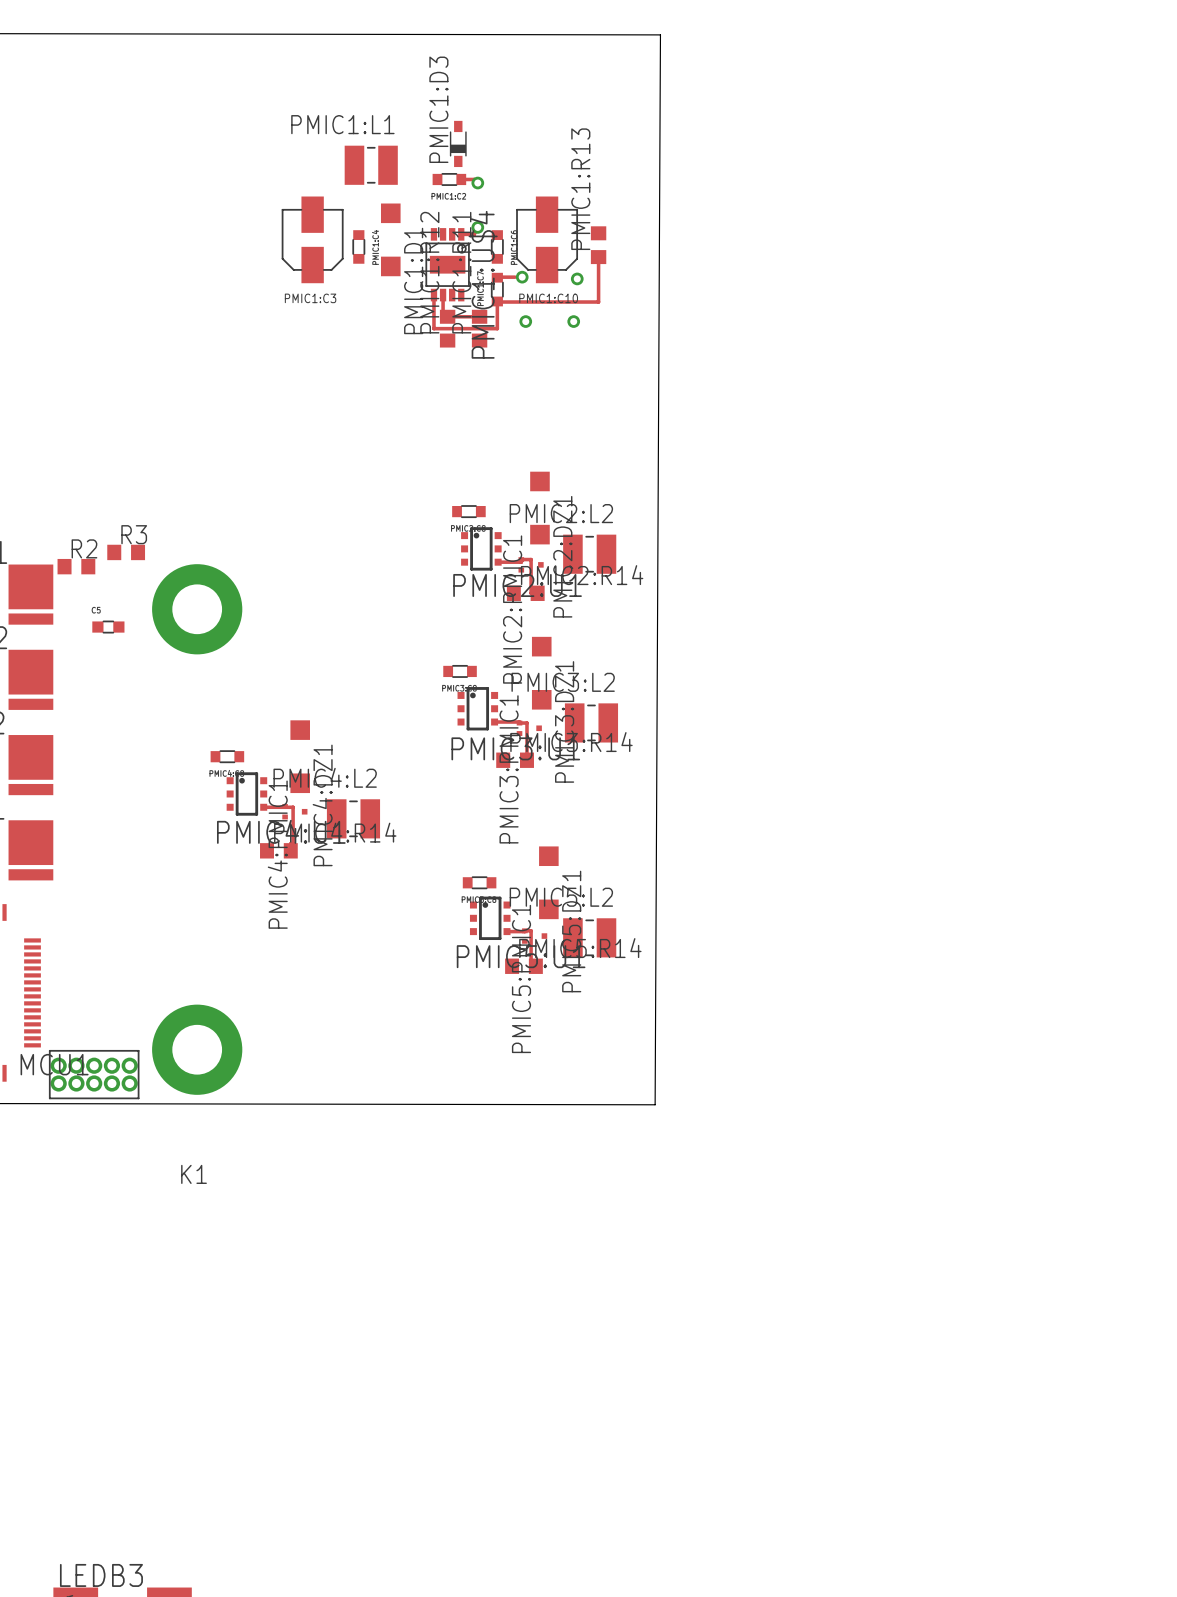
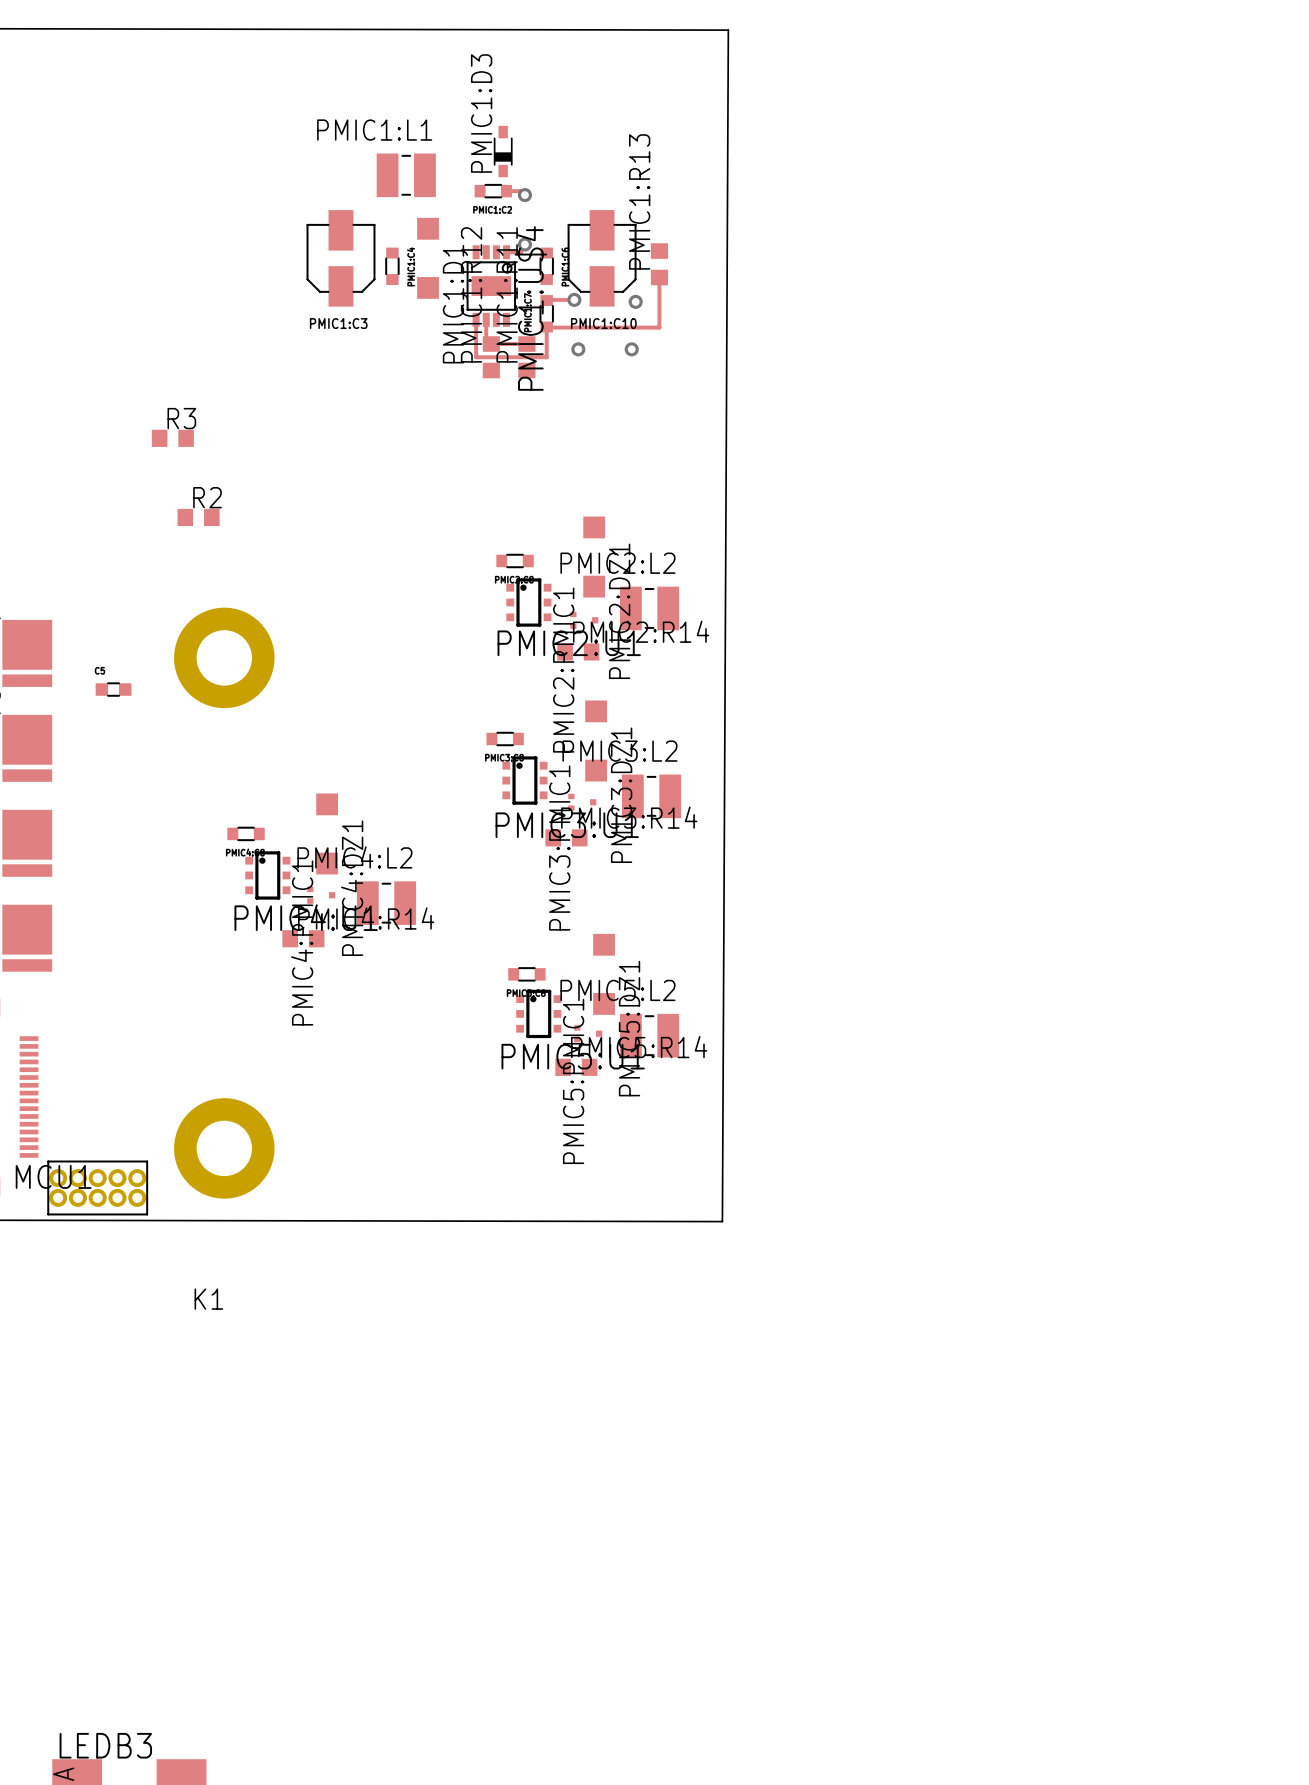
R3 position: (126, 552) -> (172, 438)
track: (498, 562) (521, 562) (521, 559) (531, 559) (531, 593) (537, 593) -> none
R2 position: (76, 566) -> (198, 517)
part position: (197, 609) -> (224, 657)
track: (494, 722) (526, 723) (526, 760) -> none
track: (263, 807) (293, 807) (293, 843) (290, 843) (290, 850) -> none
track: (507, 931) (531, 930) (531, 960) (535, 960) (535, 966) -> none
part position: (197, 1049) -> (224, 1148)

